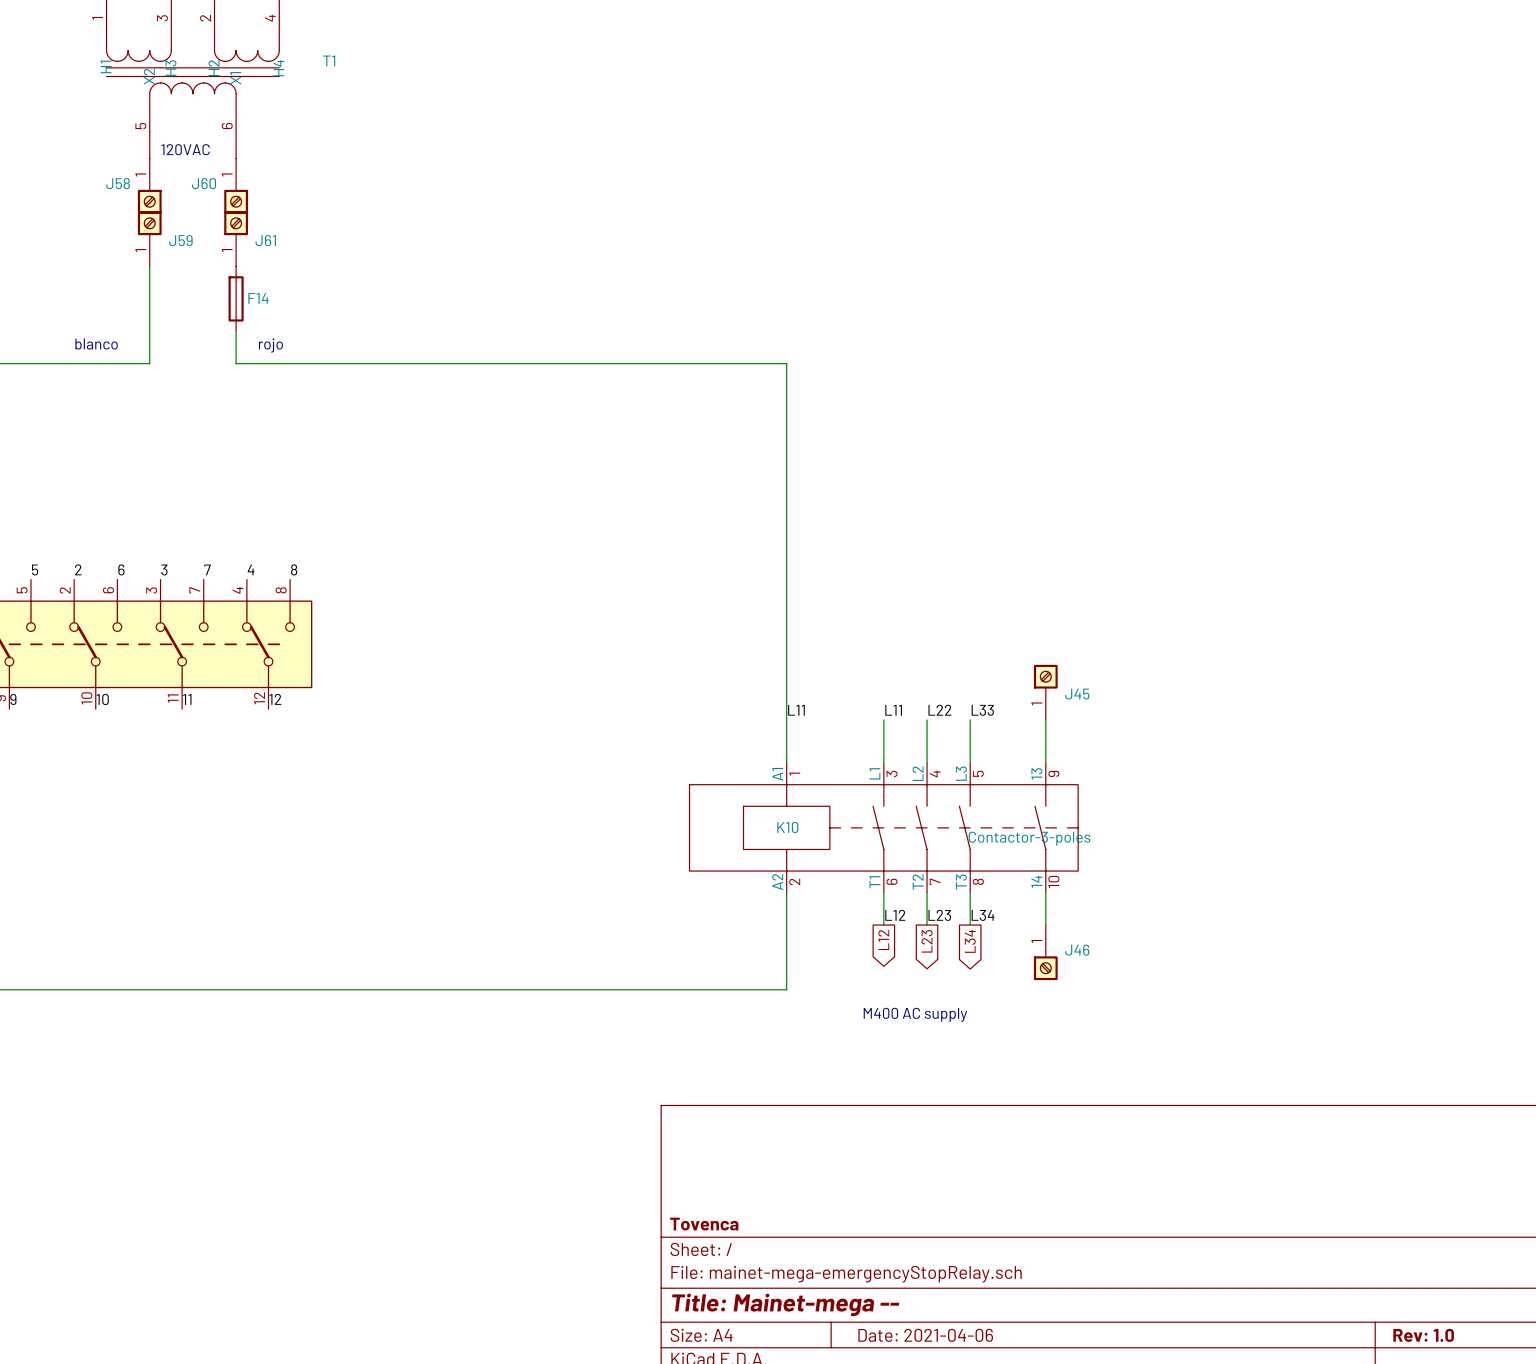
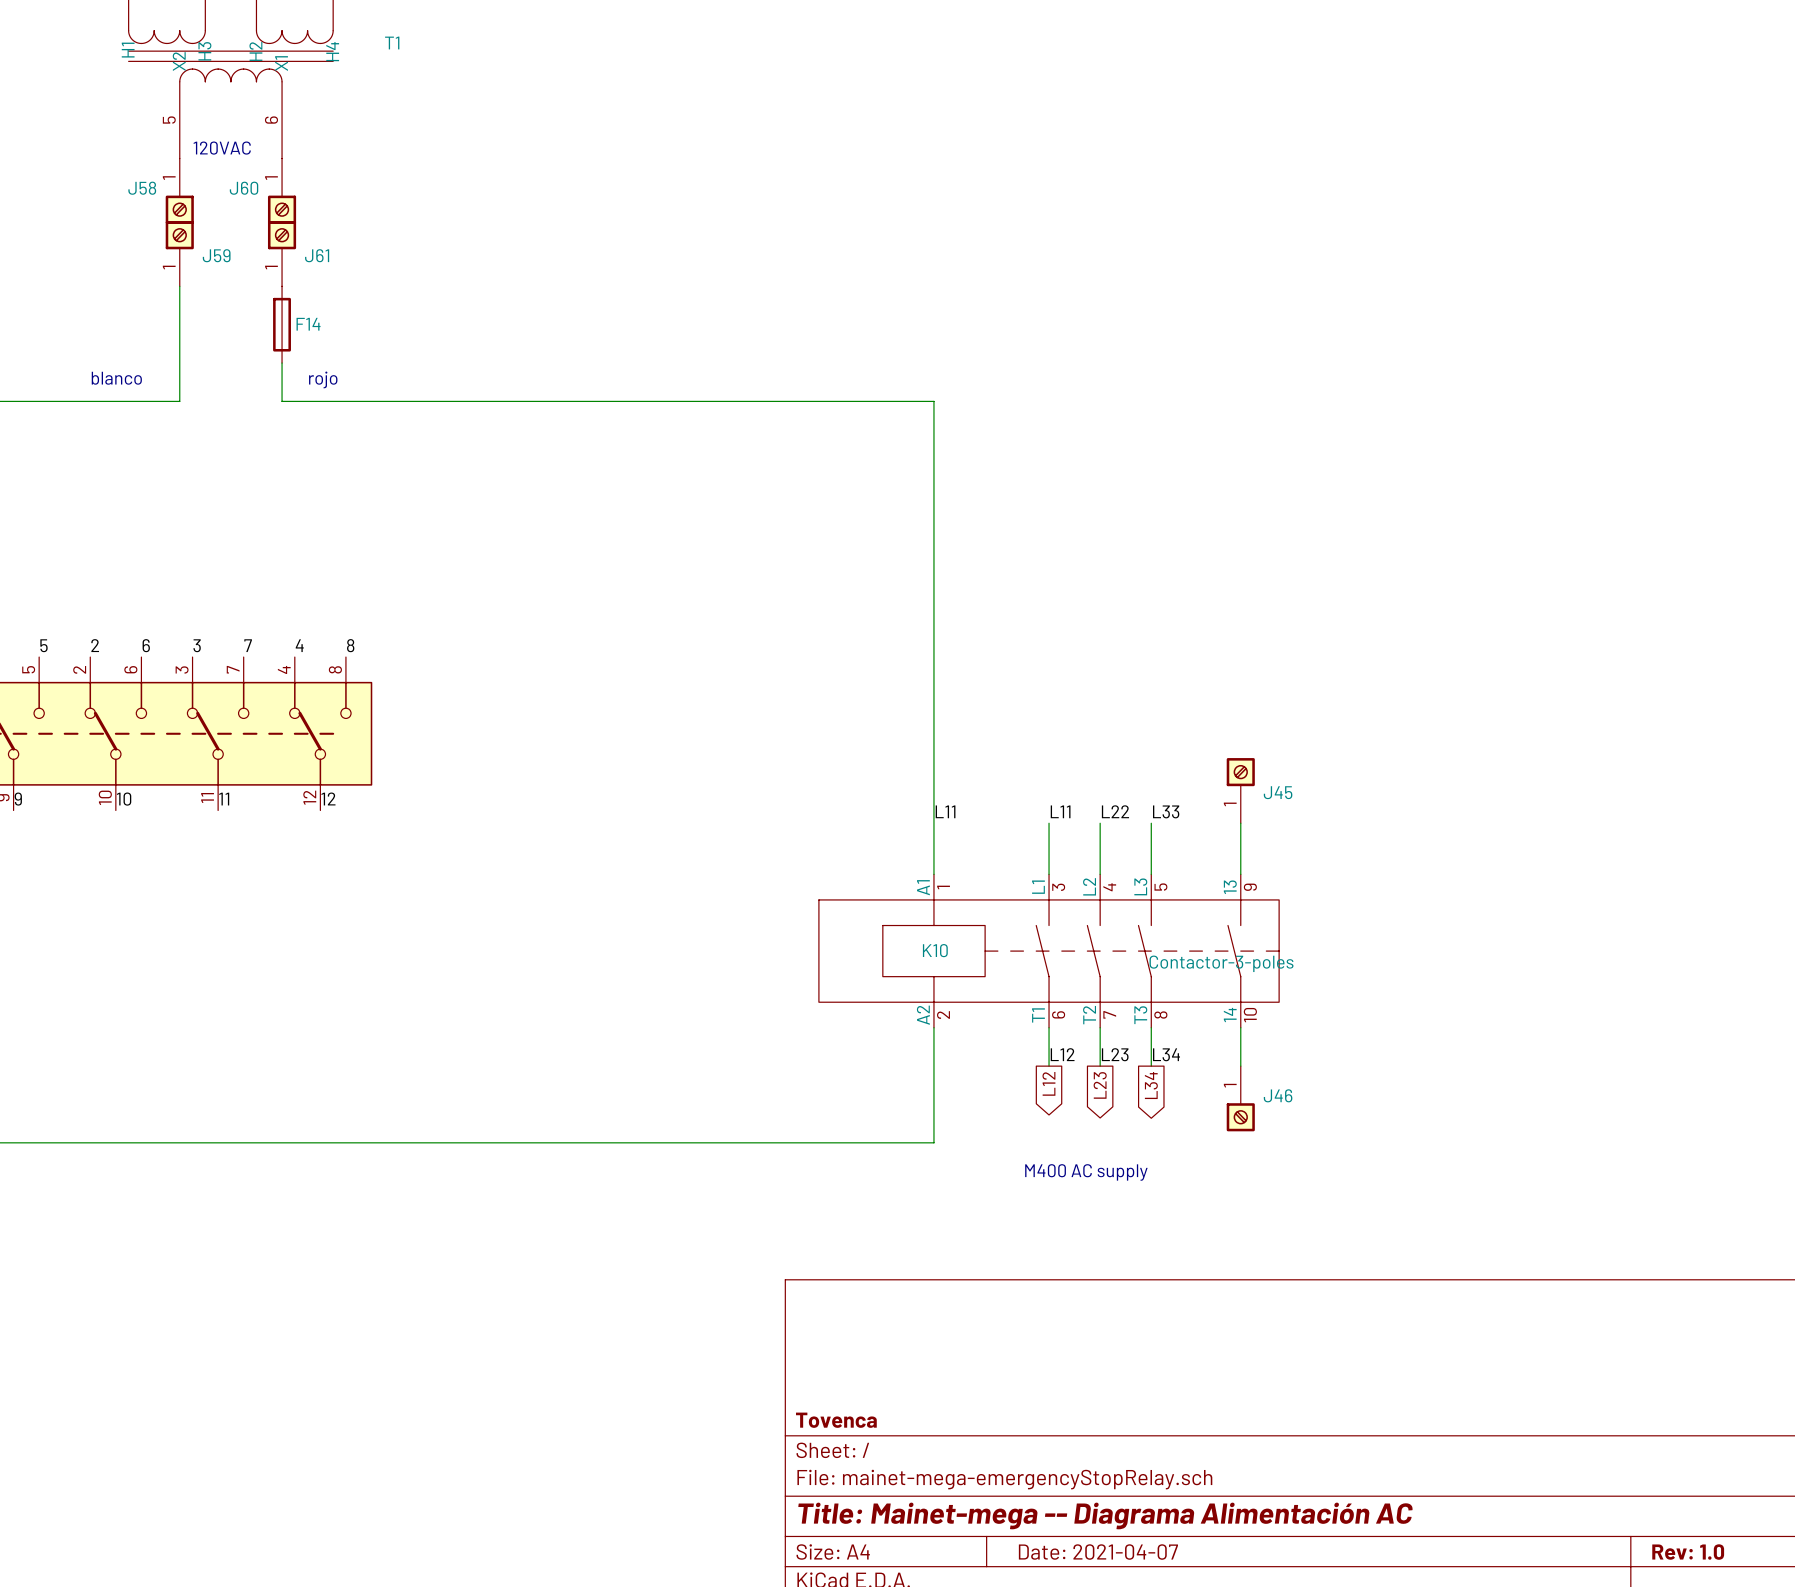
title block: Title: Mainet-mega -- (785, 1304) -> Title: Mainet-mega -- Diagrama Alimentación AC (1105, 1515)
title block: Date: 2021-04-06 (925, 1335) -> Date: 2021-04-07 (1098, 1552)

